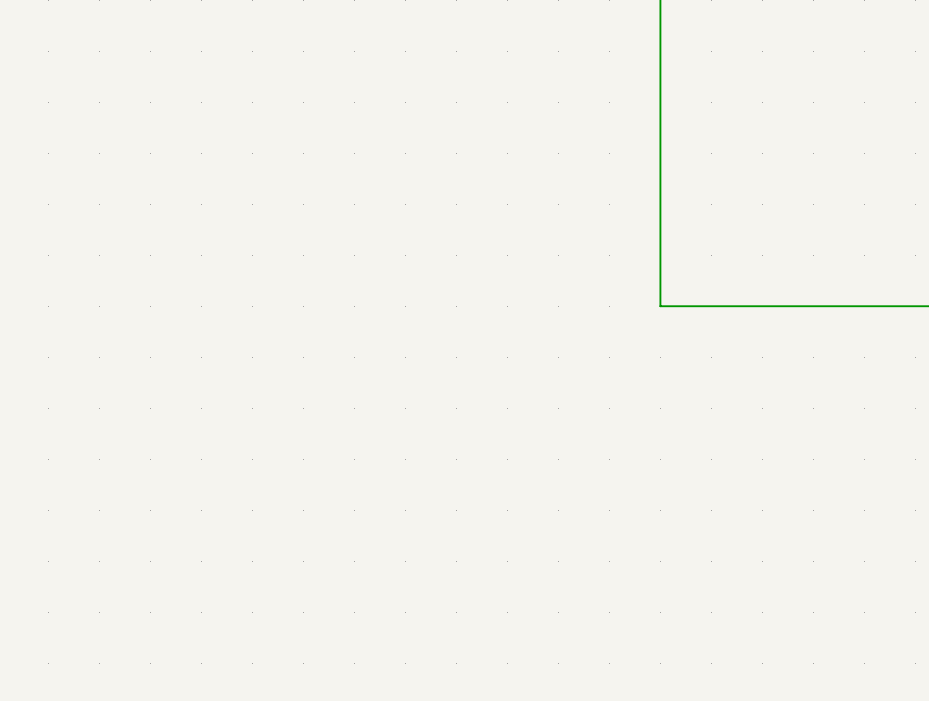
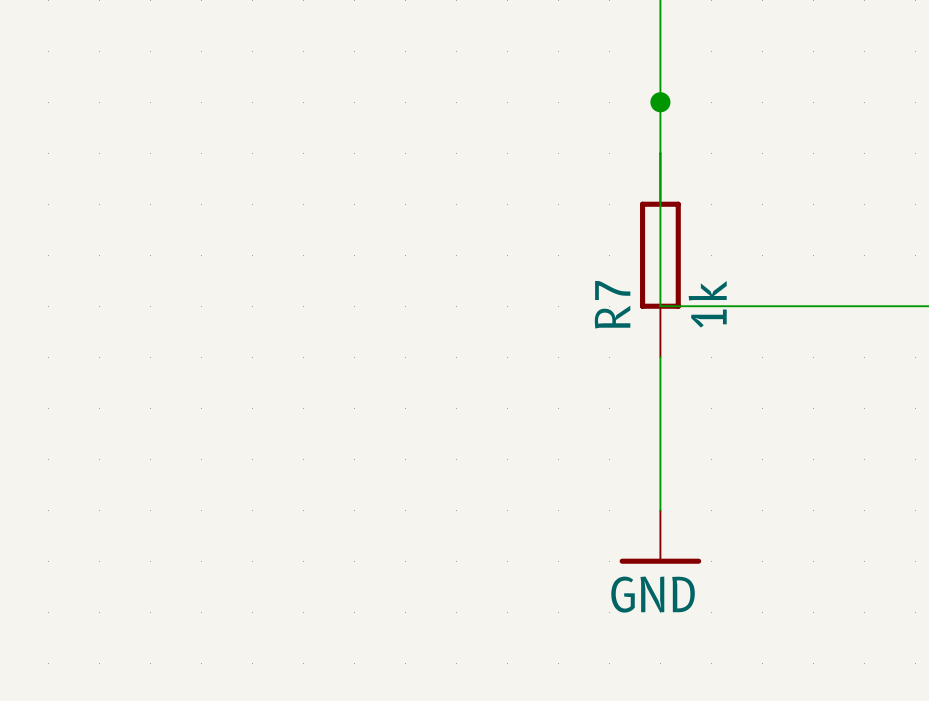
junction: none -> (660, 102)
R7: none -> 1k (660, 255)
wire: none -> (660, 357) (660, 510)
power symbol: none -> GND (660, 537)

